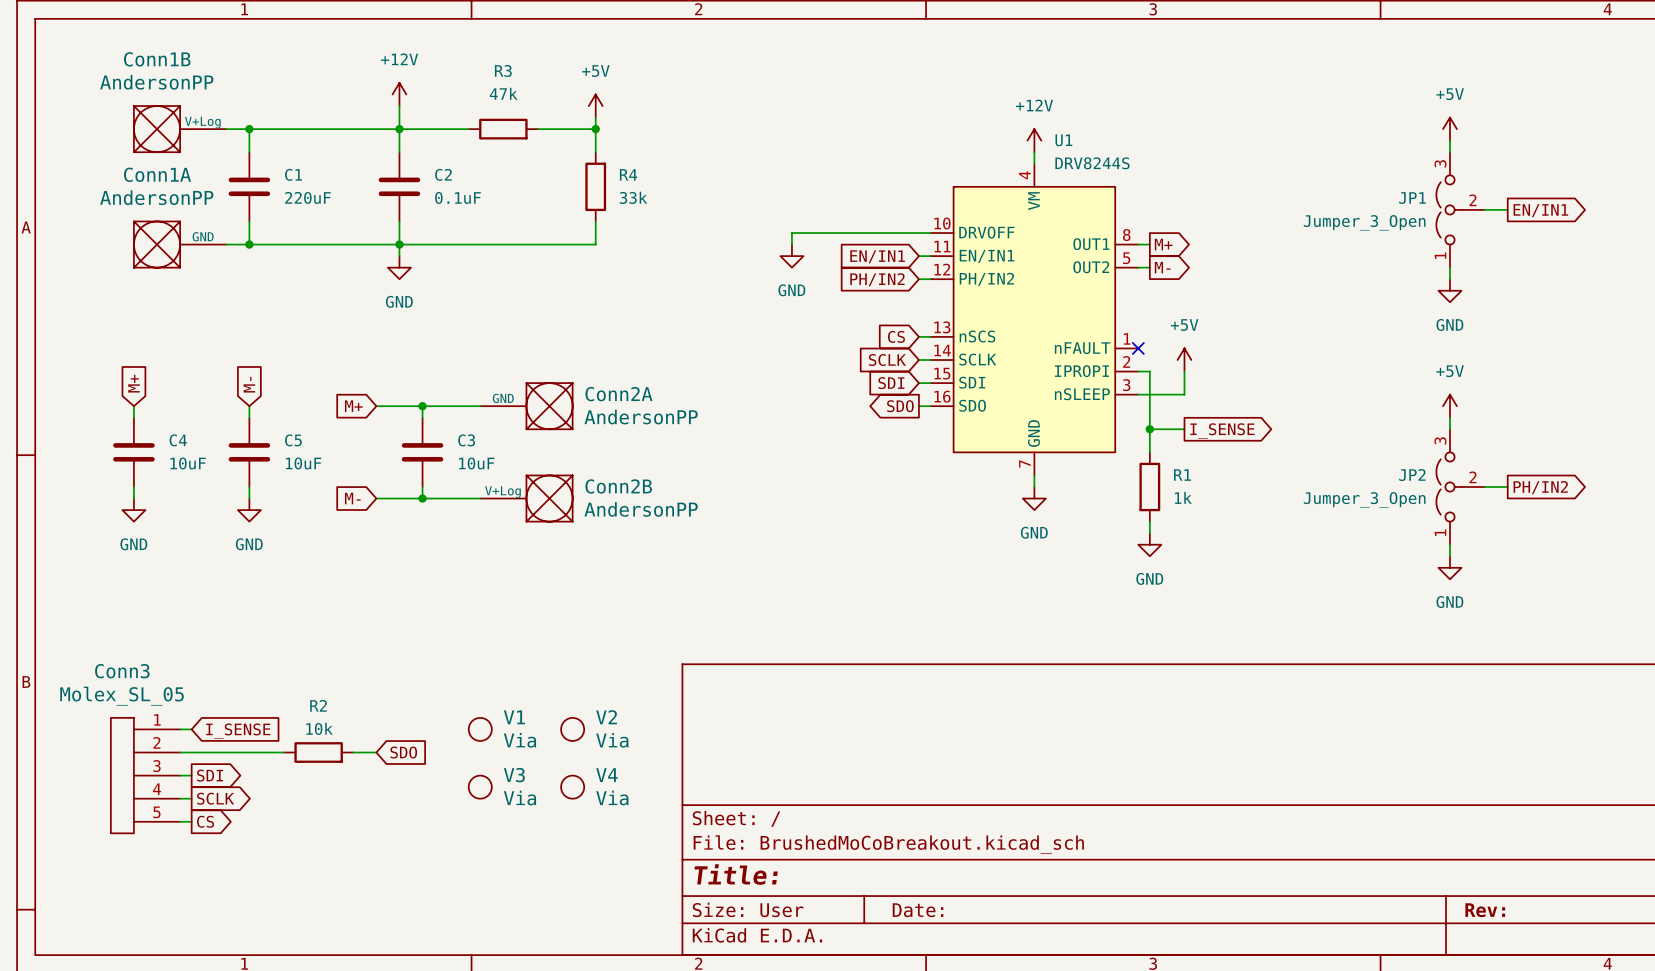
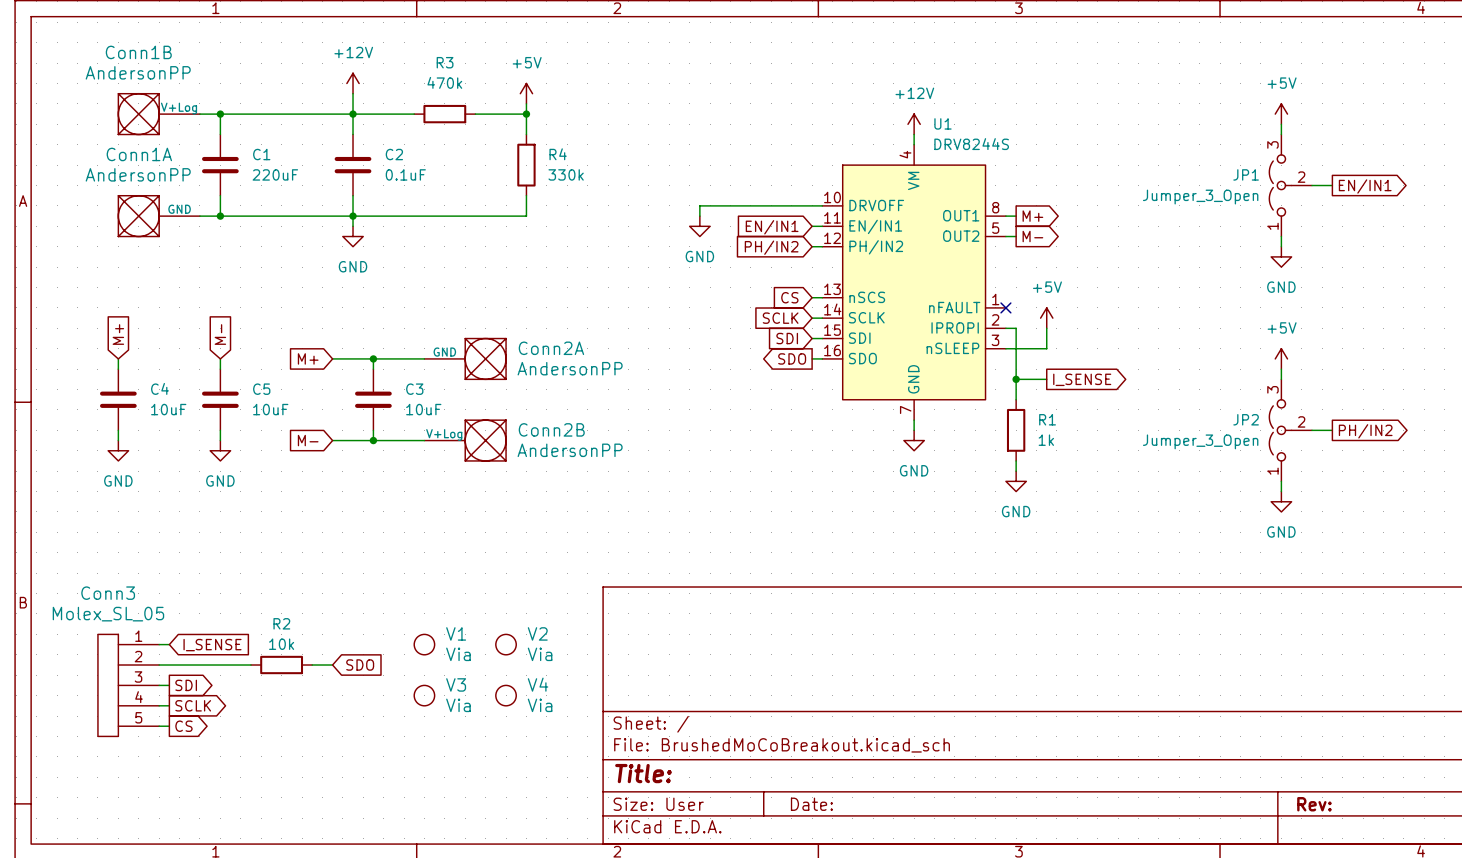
R3 value: 47k (503, 93) -> 470k (444, 82)
R4 value: 33k (633, 197) -> 330k (566, 174)

